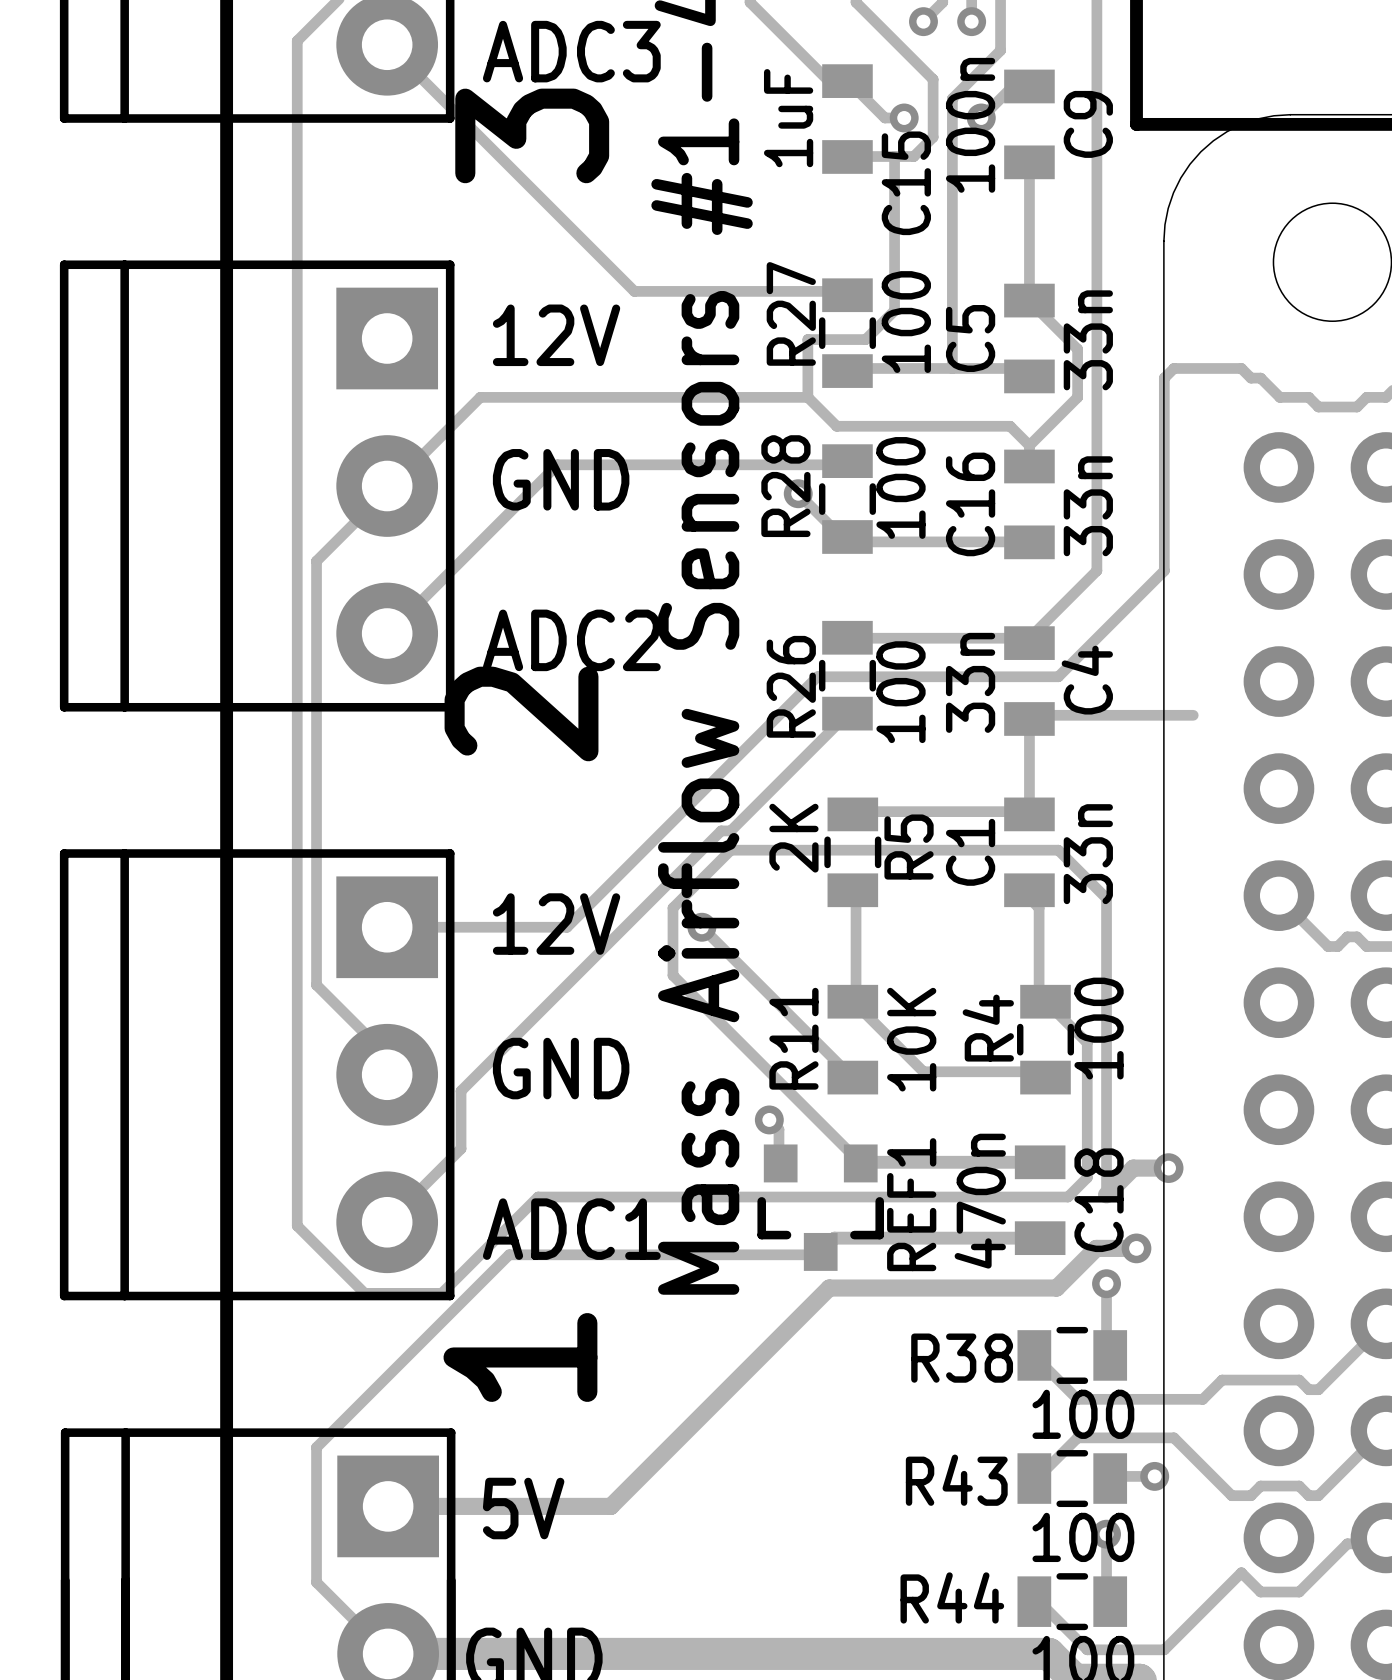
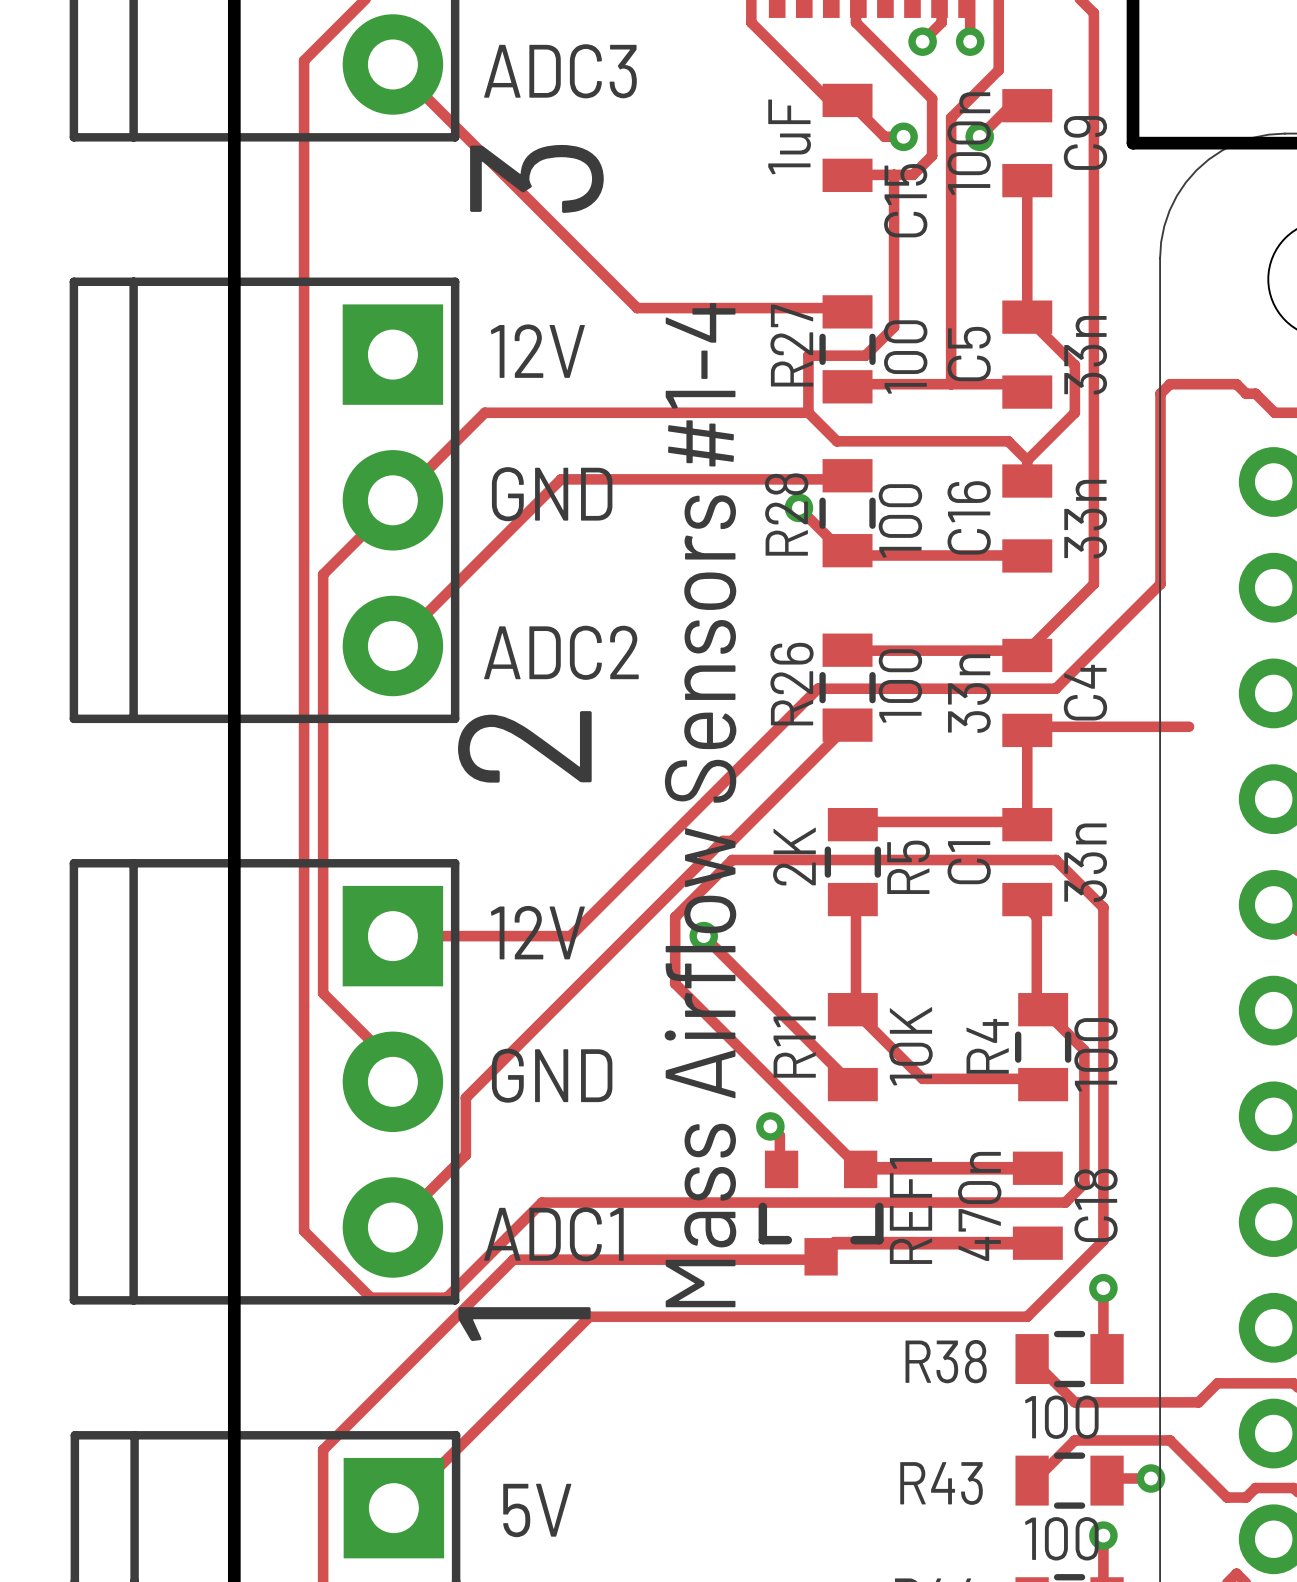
track: (1168, 1168) (1133, 1168) (1106, 1194) -> none
via: (1168, 1168) -> none
track: (1136, 1248) (1096, 1248) (1056, 1288) (829, 1288) (610, 1506) (388, 1506) -> (1103, 1200) (1103, 1240) (1027, 1316) (589, 1316) (399, 1507) (393, 1508)
via: (1136, 1248) -> none

